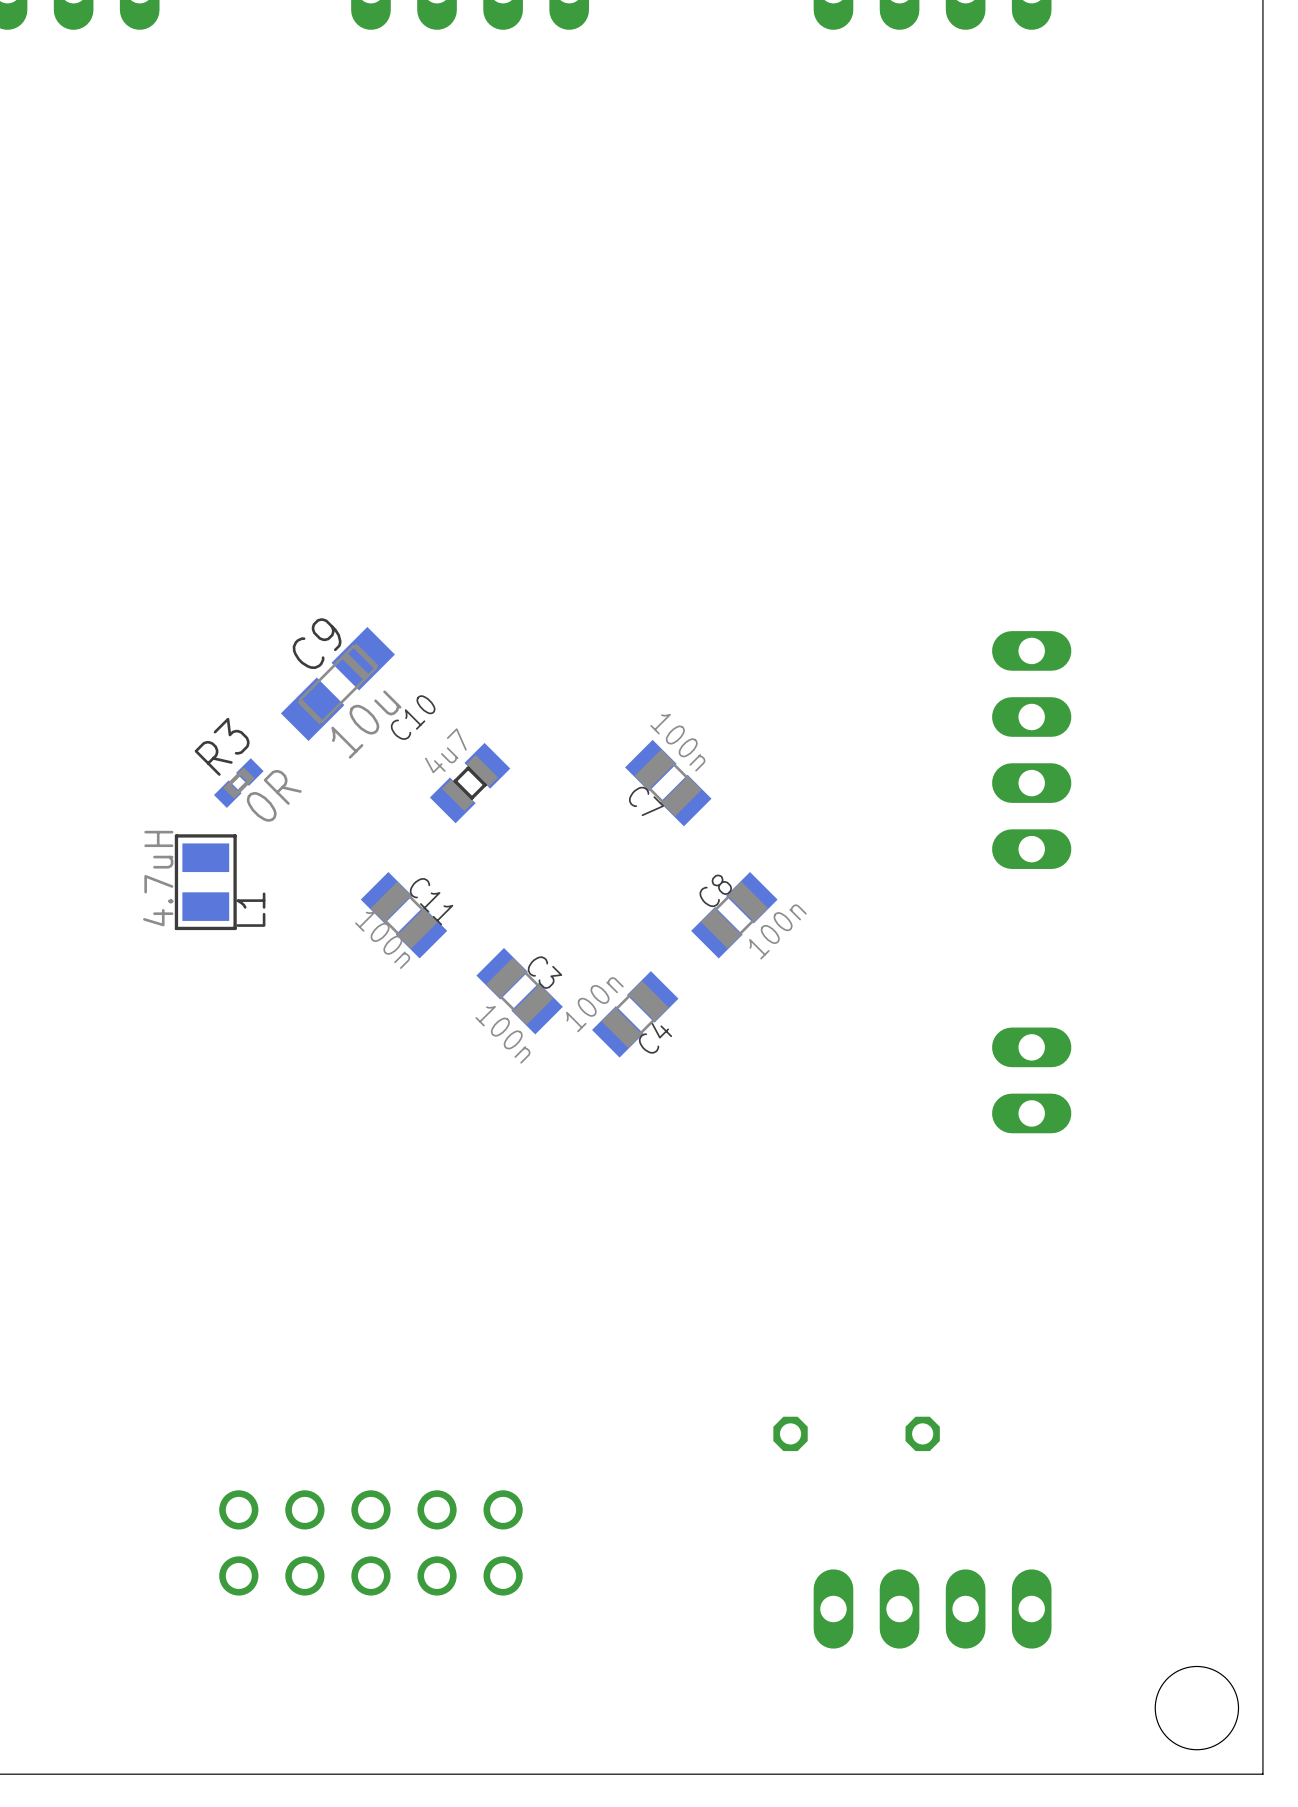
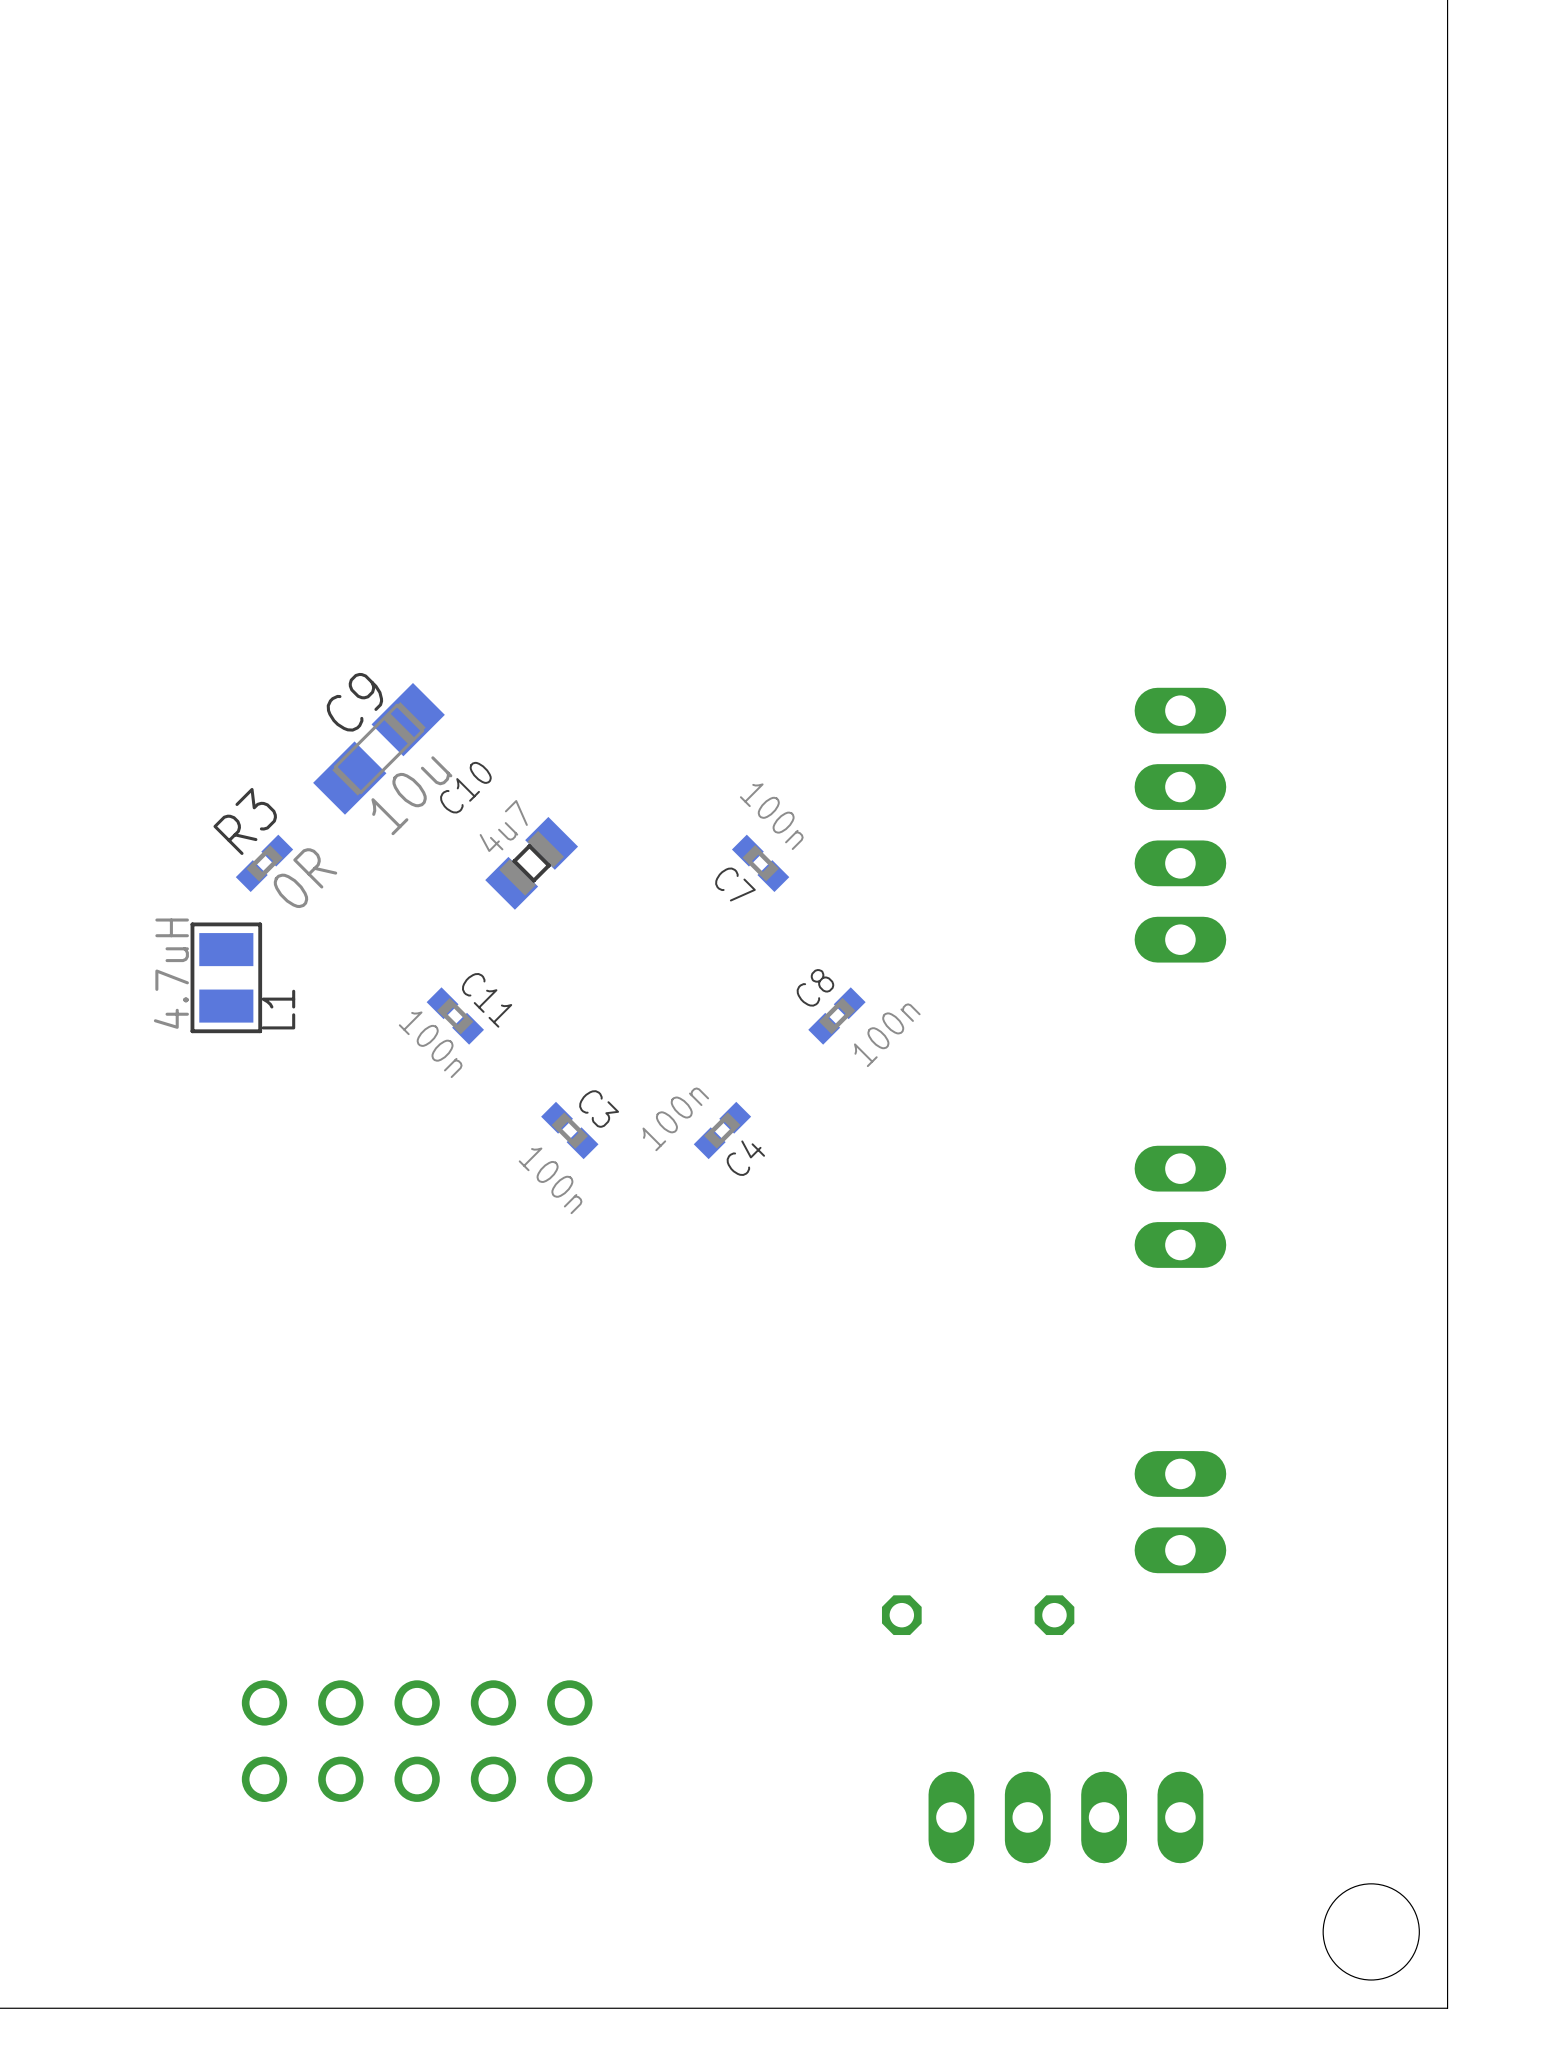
C7 footprint: [625, 739, 712, 827] -> [731, 834, 790, 893]
C11 footprint: [360, 872, 448, 959] -> [426, 987, 485, 1045]
C8 footprint: [691, 872, 778, 959] -> [808, 987, 866, 1045]
C3 footprint: [476, 947, 563, 1035] -> [541, 1101, 599, 1160]
C4 footprint: [592, 971, 679, 1058] -> [693, 1101, 752, 1160]
part: none -> (1180, 1512)

